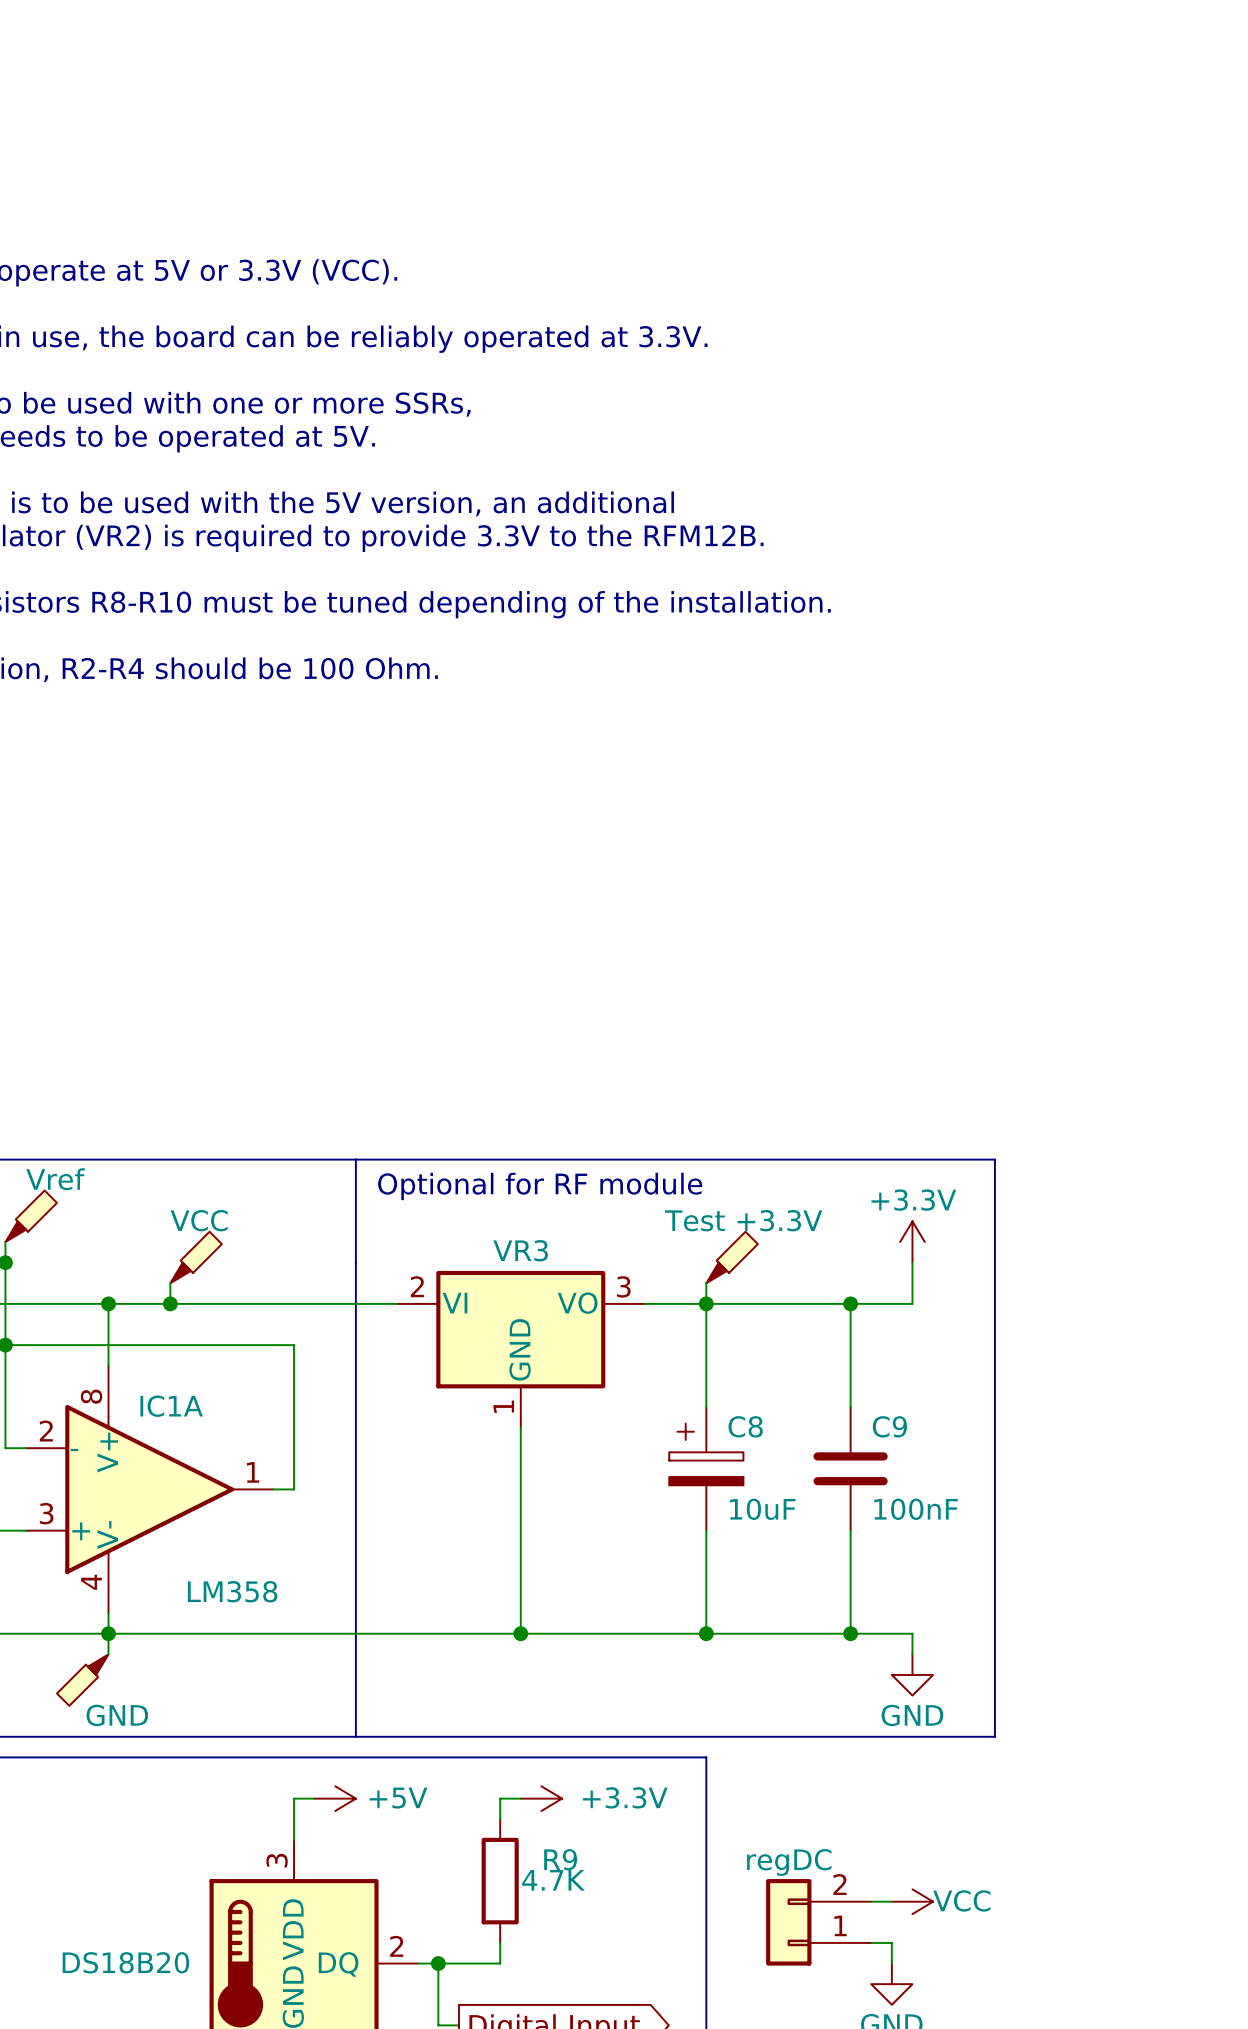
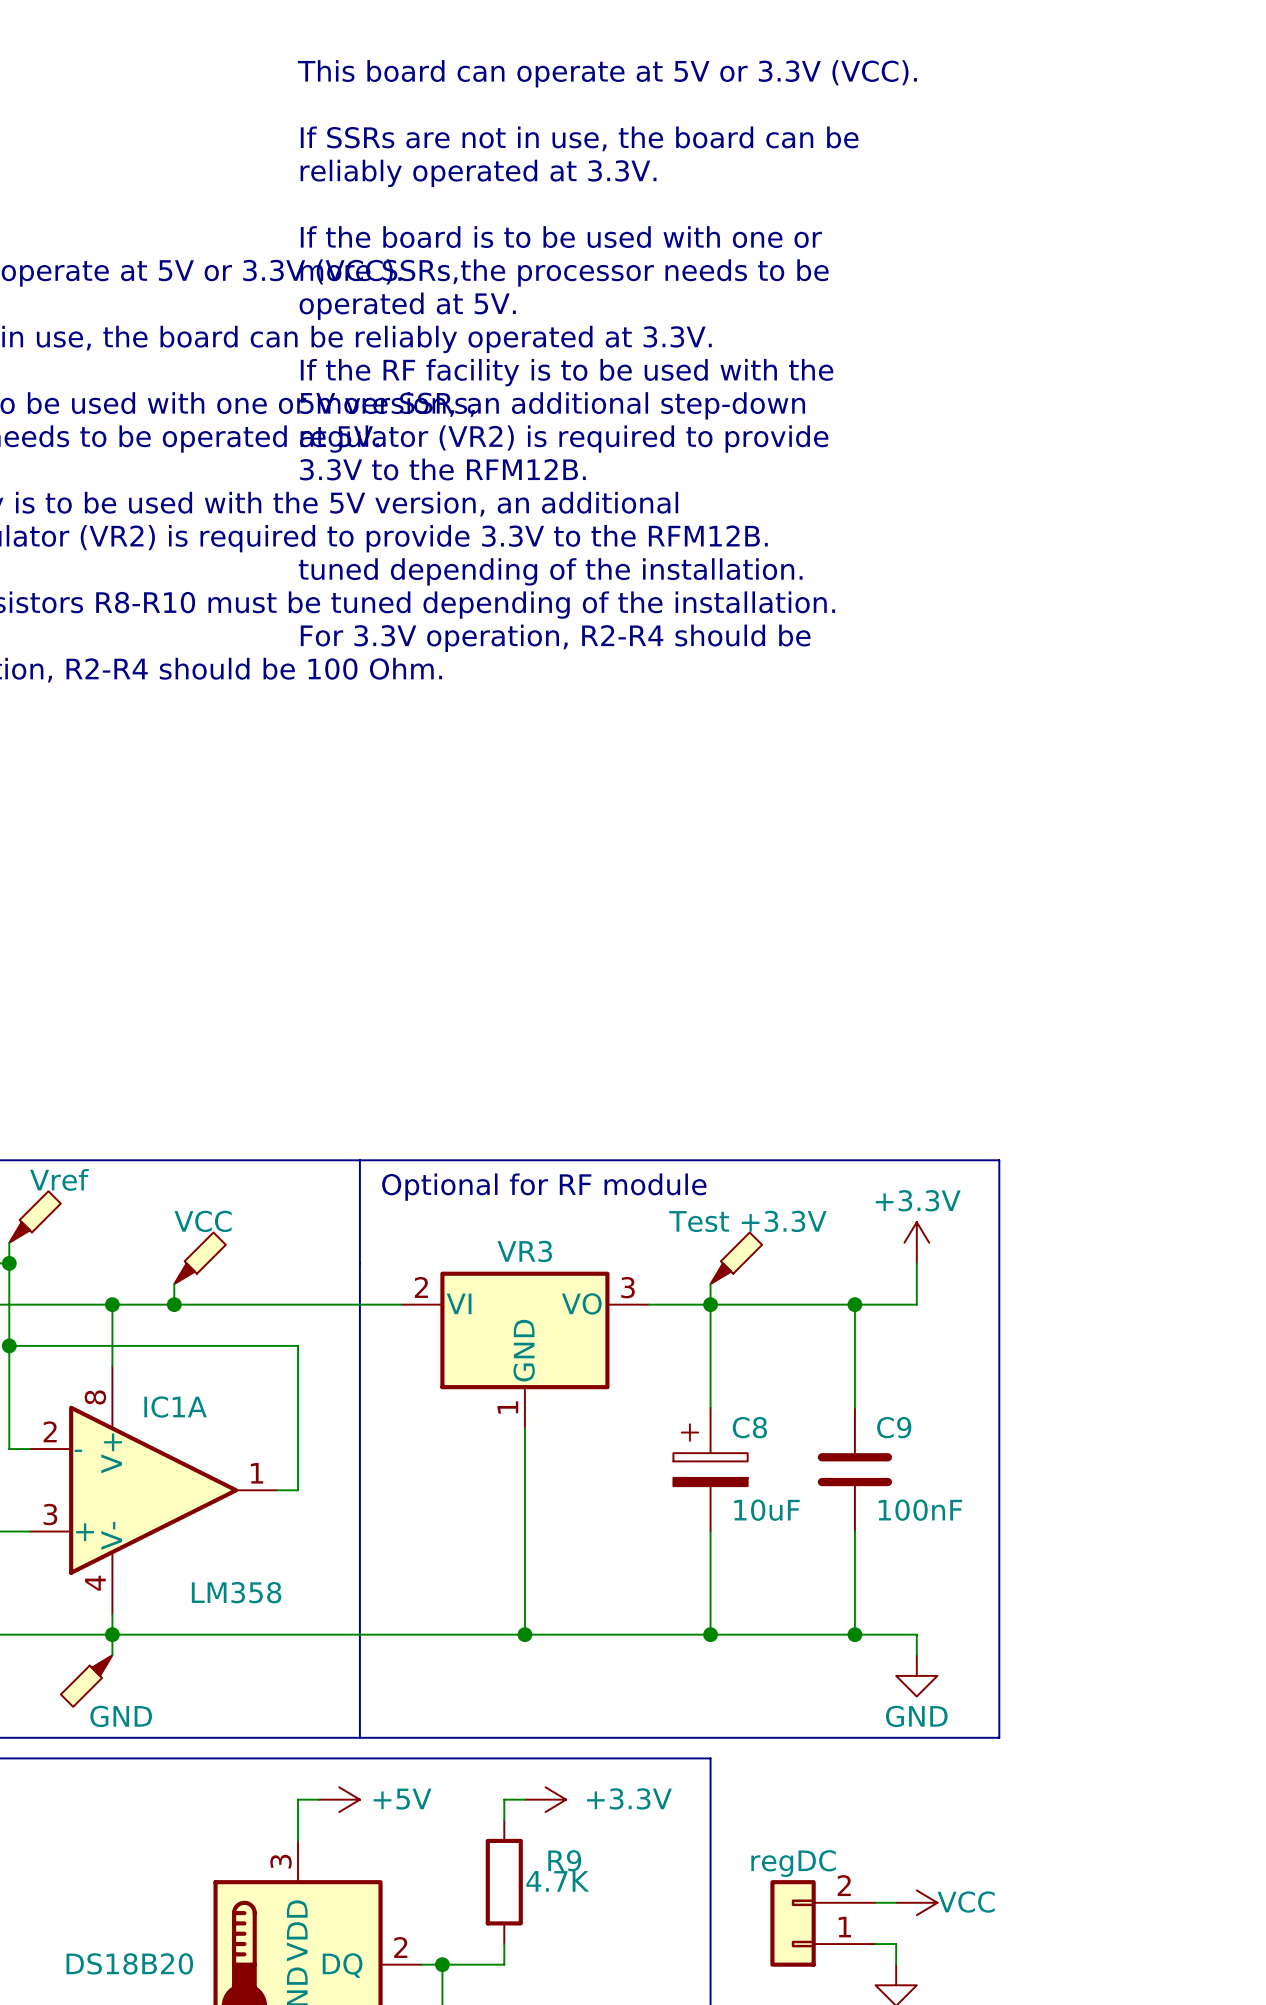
text: none -> This board can operate at 5V or 3.3V (VCC). (607, 73)
text: none -> If SSRs are not in use, the board can be (579, 138)
text: none -> reliably operated at 3.3V. (478, 173)
text: none -> If the board is to be used with one or (561, 237)
text: none -> more SSRs,the processor needs to be (564, 273)
text: none -> operated at 5V. (407, 306)
text: none -> If the RF facility is to be used with the (567, 372)
text: none -> 5V version, an additional step-down (552, 405)
text: none -> regulator (VR2) is required to provide (564, 439)
text: none -> 3.3V to the RFM12B. (443, 469)
text: none -> tuned depending of the installation. (550, 571)
text: none -> For 3.3V operation, R2-R4 should be (555, 638)

